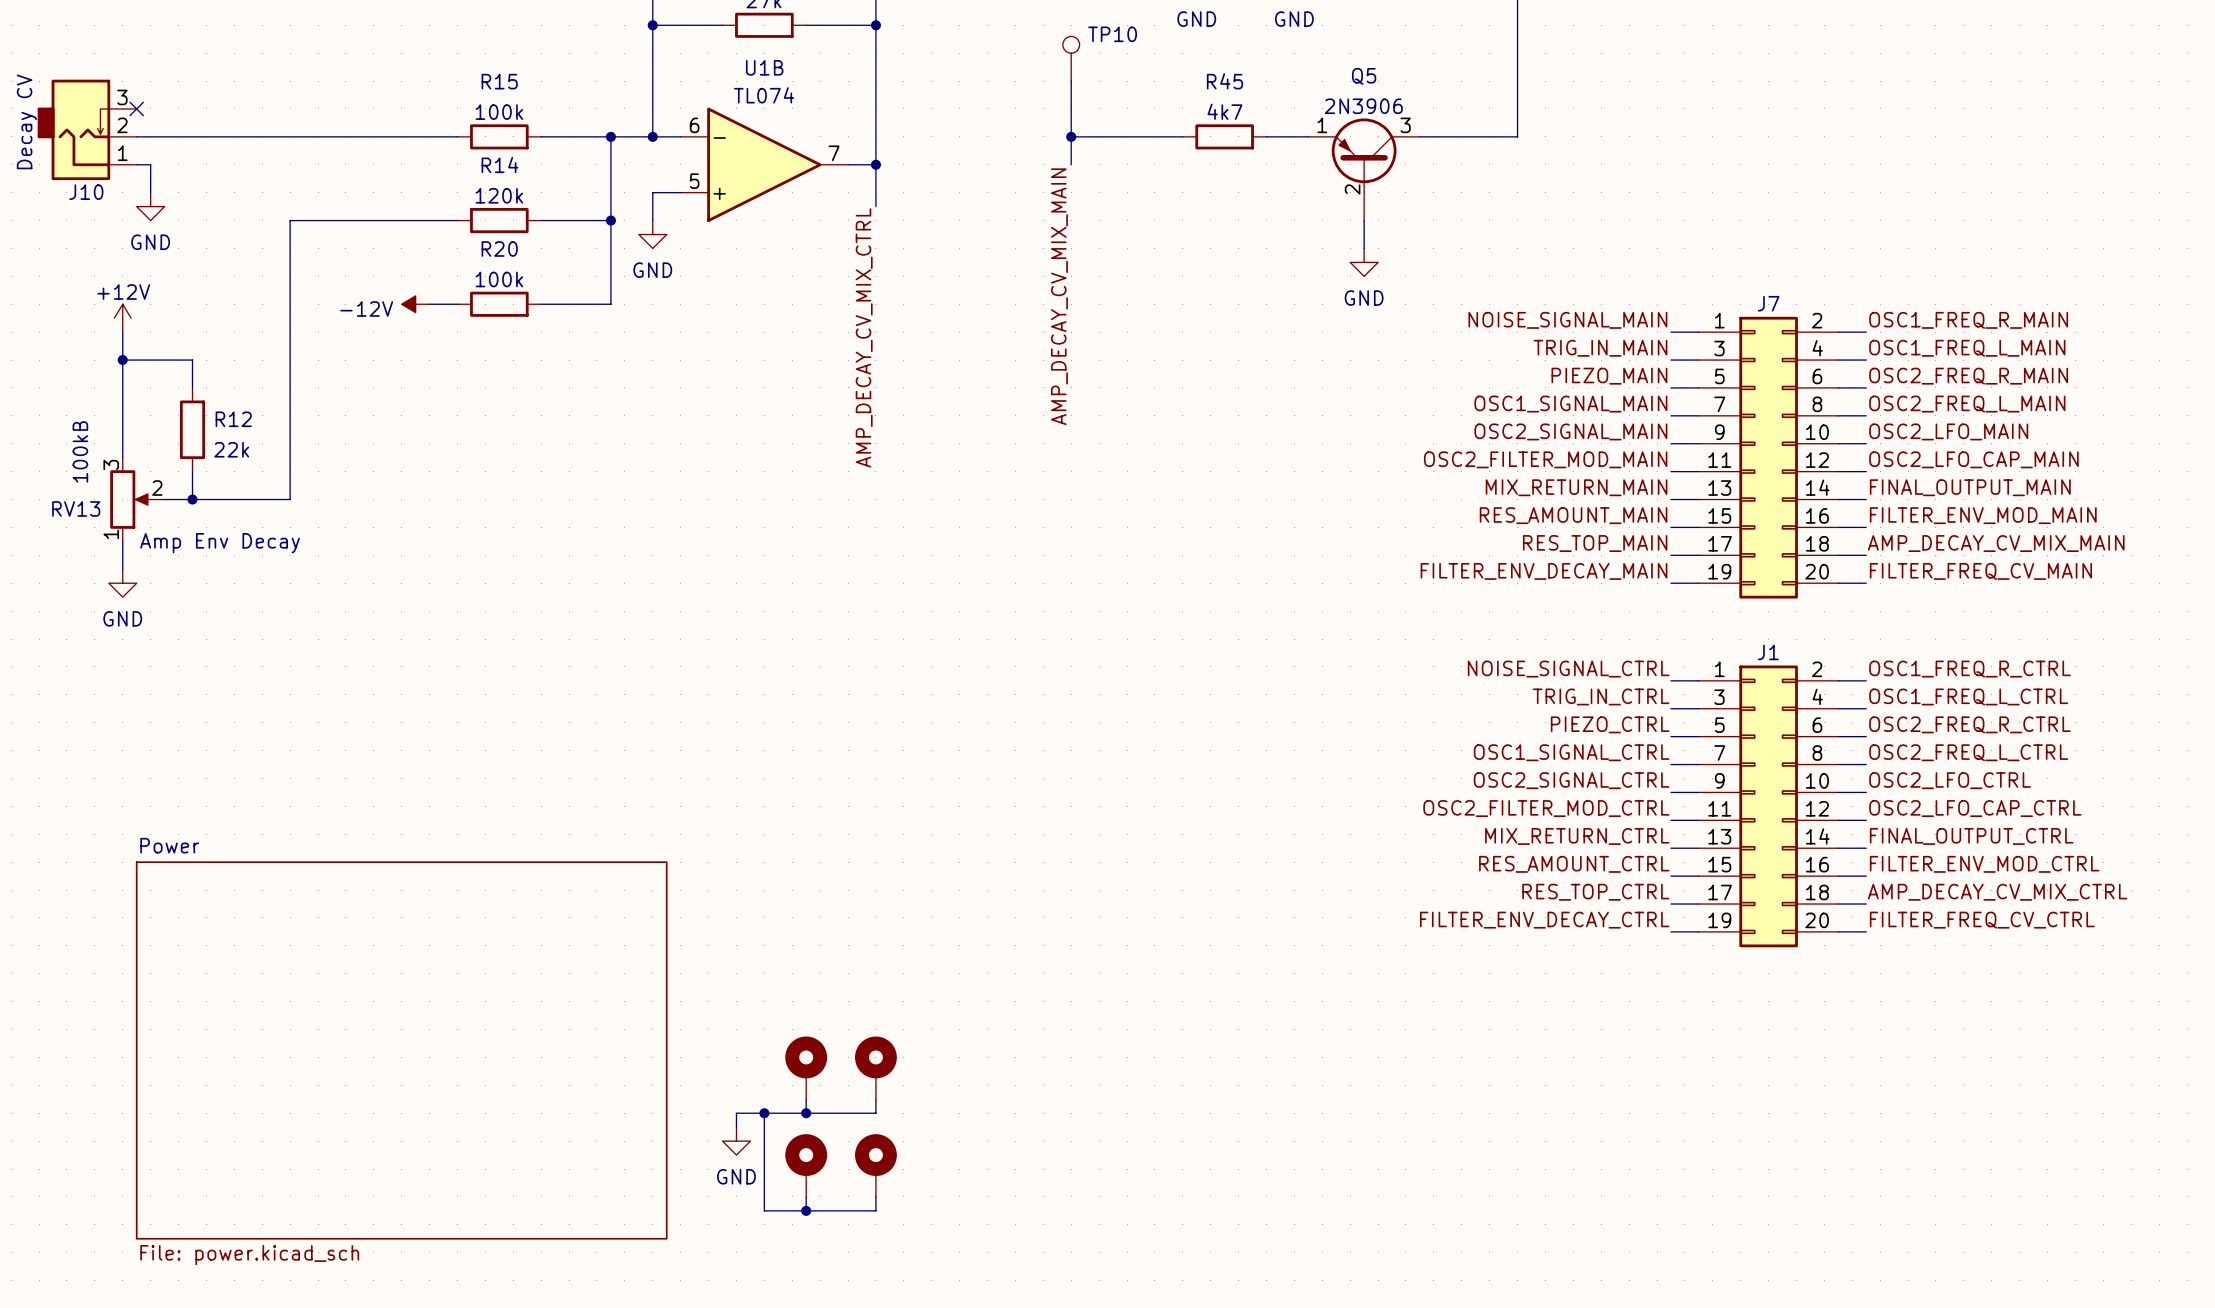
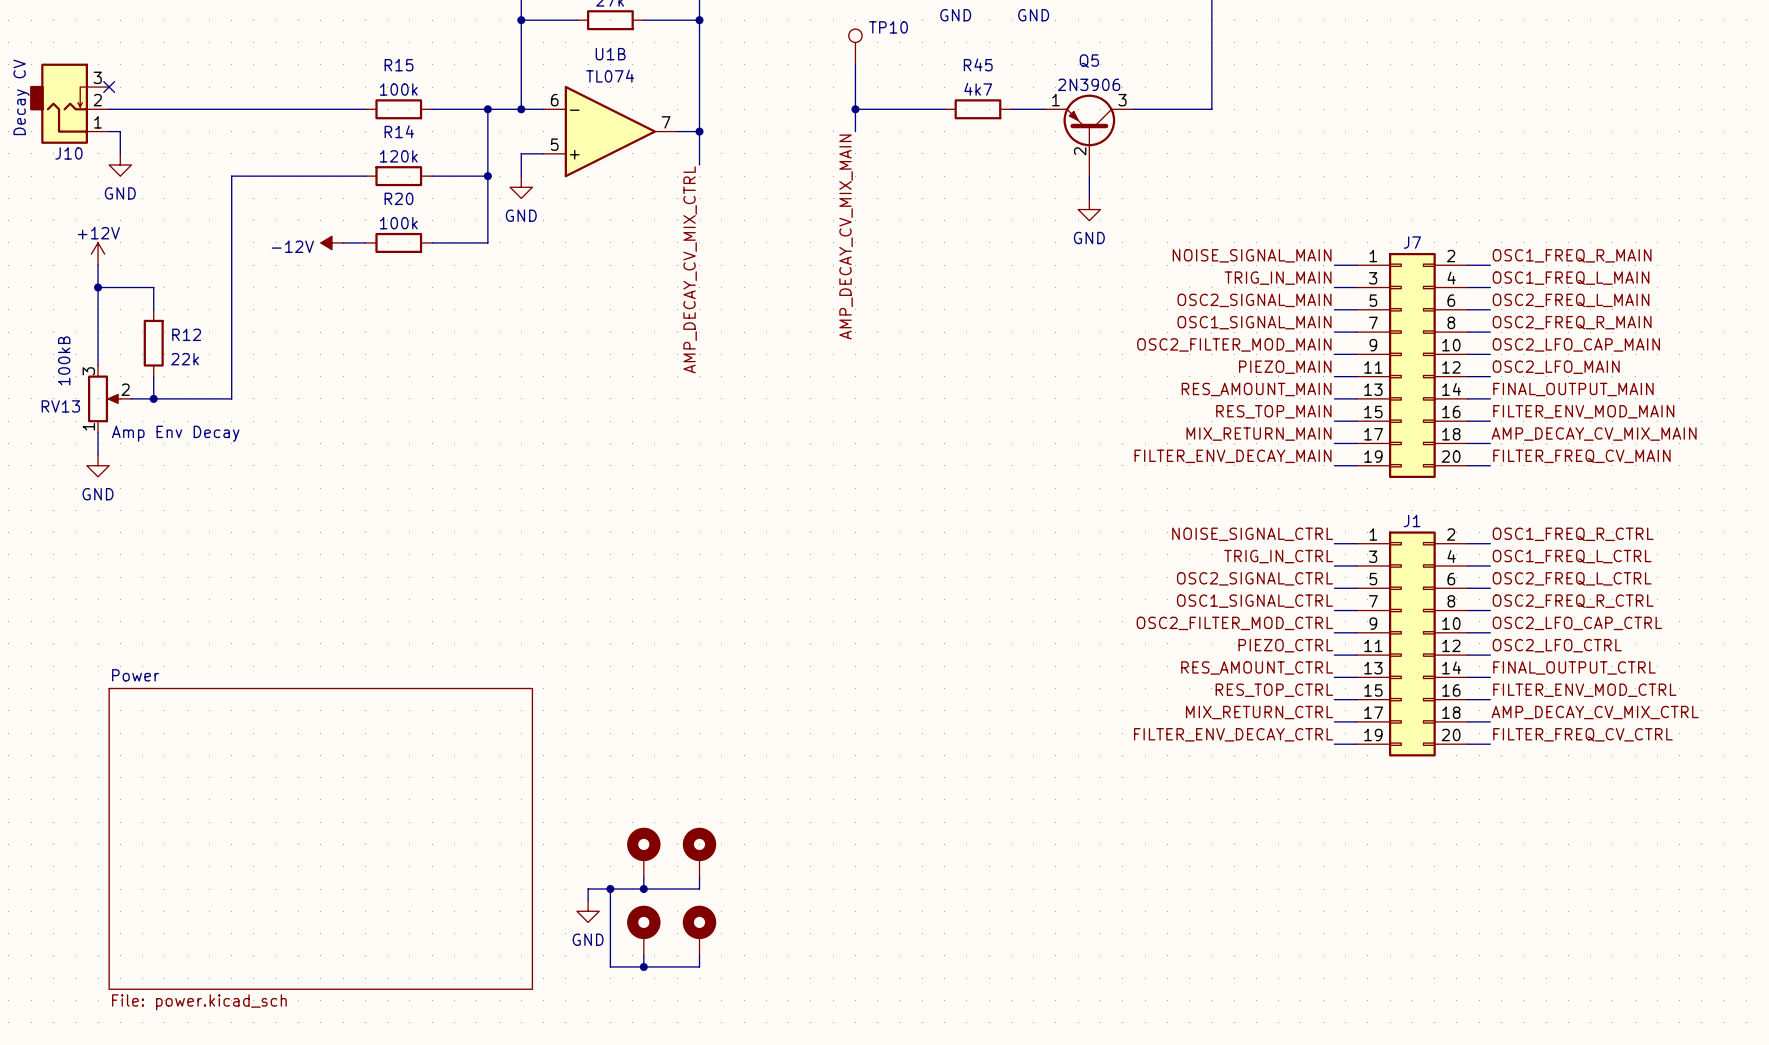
label: PIEZO_MAIN (1609, 376) -> OSC2_SIGNAL_MAIN (1254, 300)
label: OSC2_FREQ_R_MAIN (1968, 376) -> OSC2_FREQ_L_MAIN (1571, 300)
label: OSC2_FREQ_L_MAIN (1967, 404) -> OSC2_FREQ_R_MAIN (1572, 322)
label: OSC2_SIGNAL_MAIN (1570, 431) -> OSC2_FILTER_MOD_MAIN (1234, 344)
label: OSC2_LFO_MAIN (1948, 431) -> OSC2_LFO_CAP_MAIN (1576, 344)
label: OSC2_FILTER_MOD_MAIN (1545, 459) -> PIEZO_MAIN (1285, 367)
label: OSC2_LFO_CAP_MAIN (1973, 459) -> OSC2_LFO_MAIN (1556, 367)
label: MIX_RETURN_MAIN (1576, 487) -> RES_AMOUNT_MAIN (1256, 389)
label: RES_AMOUNT_MAIN (1573, 515) -> RES_TOP_MAIN (1273, 411)
label: RES_TOP_MAIN (1595, 543) -> MIX_RETURN_MAIN (1259, 434)
label: PIEZO_CTRL (1610, 724) -> OSC2_SIGNAL_CTRL (1255, 578)
label: OSC2_FREQ_R_CTRL (1969, 724) -> OSC2_FREQ_L_CTRL (1572, 578)
label: OSC2_FREQ_L_CTRL (1968, 752) -> OSC2_FREQ_R_CTRL (1573, 601)
label: OSC2_SIGNAL_CTRL (1571, 780) -> OSC2_FILTER_MOD_CTRL (1234, 623)
label: OSC2_LFO_CTRL (1950, 780) -> OSC2_LFO_CAP_CTRL (1577, 623)
label: OSC2_FILTER_MOD_CTRL (1546, 808) -> PIEZO_CTRL (1285, 645)
label: OSC2_LFO_CAP_CTRL (1975, 808) -> OSC2_LFO_CTRL (1557, 645)
label: MIX_RETURN_CTRL (1577, 836) -> RES_AMOUNT_CTRL (1257, 667)
label: RES_AMOUNT_CTRL (1574, 864) -> RES_TOP_CTRL (1274, 690)
label: RES_TOP_CTRL (1595, 892) -> MIX_RETURN_CTRL (1259, 712)

